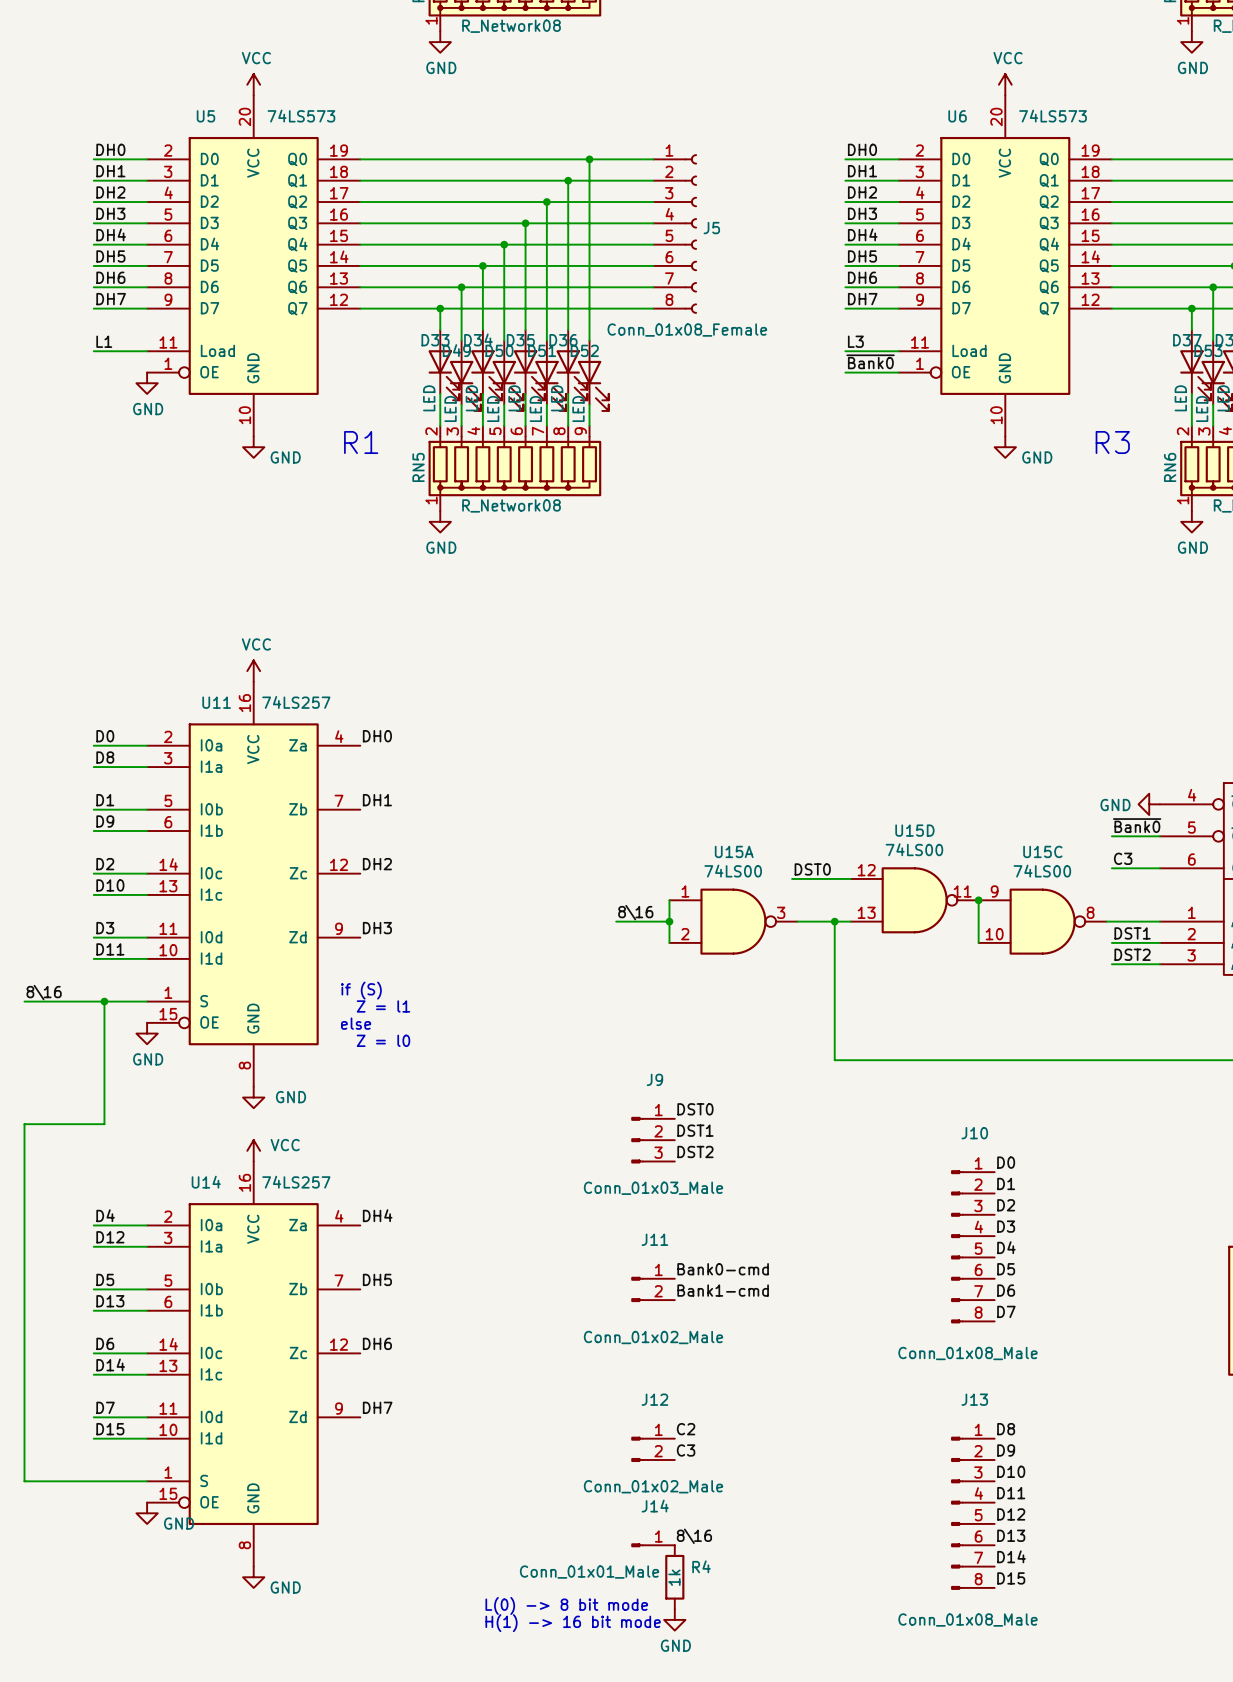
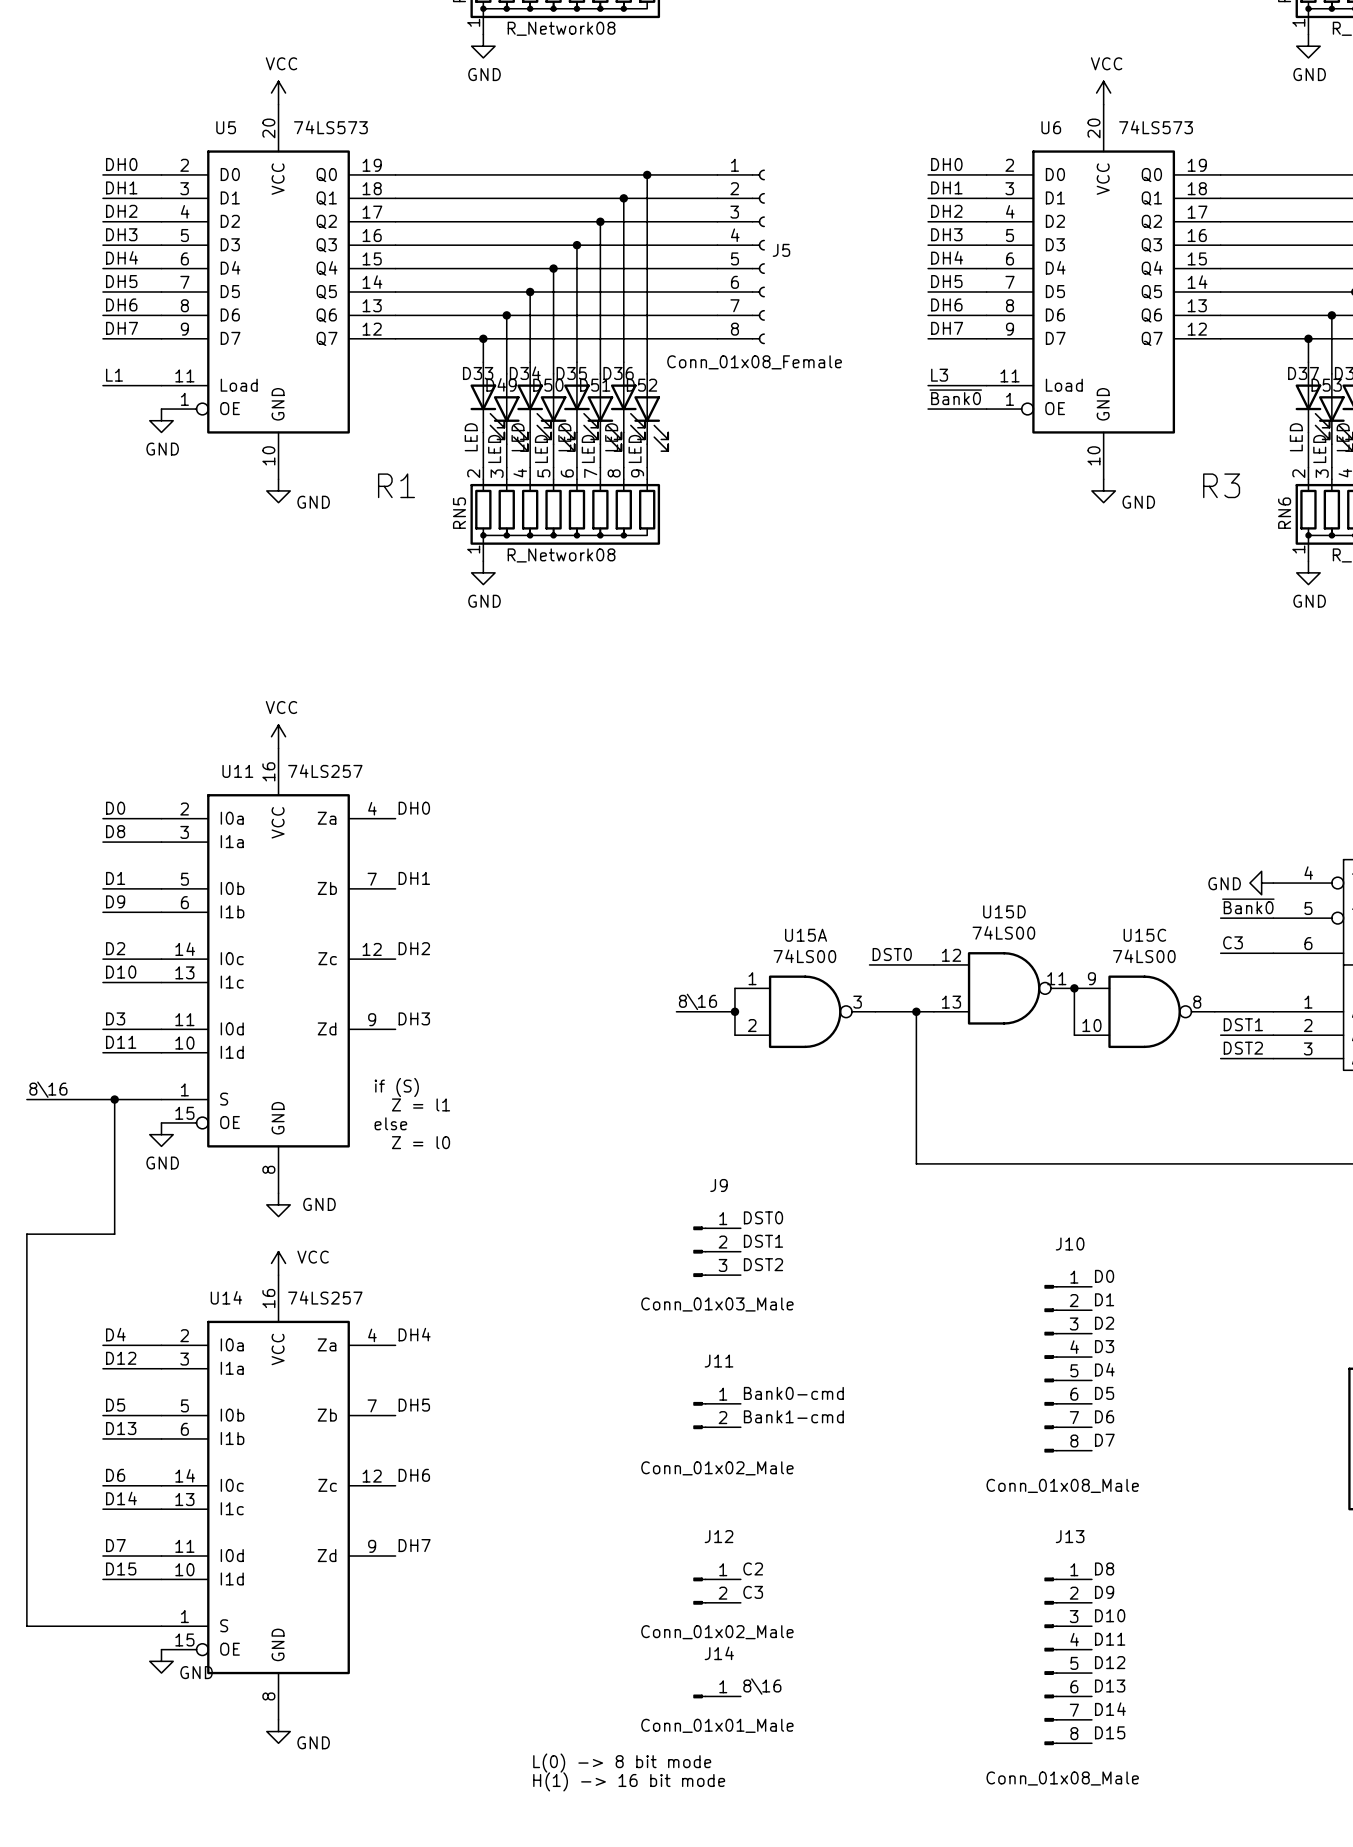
J14 value position: Conn_01x01_Male (589, 1572) -> Conn_01x01_Male (717, 1725)
R4: 1k (674, 1577) -> none
power symbol: GND (674, 1619) -> none

